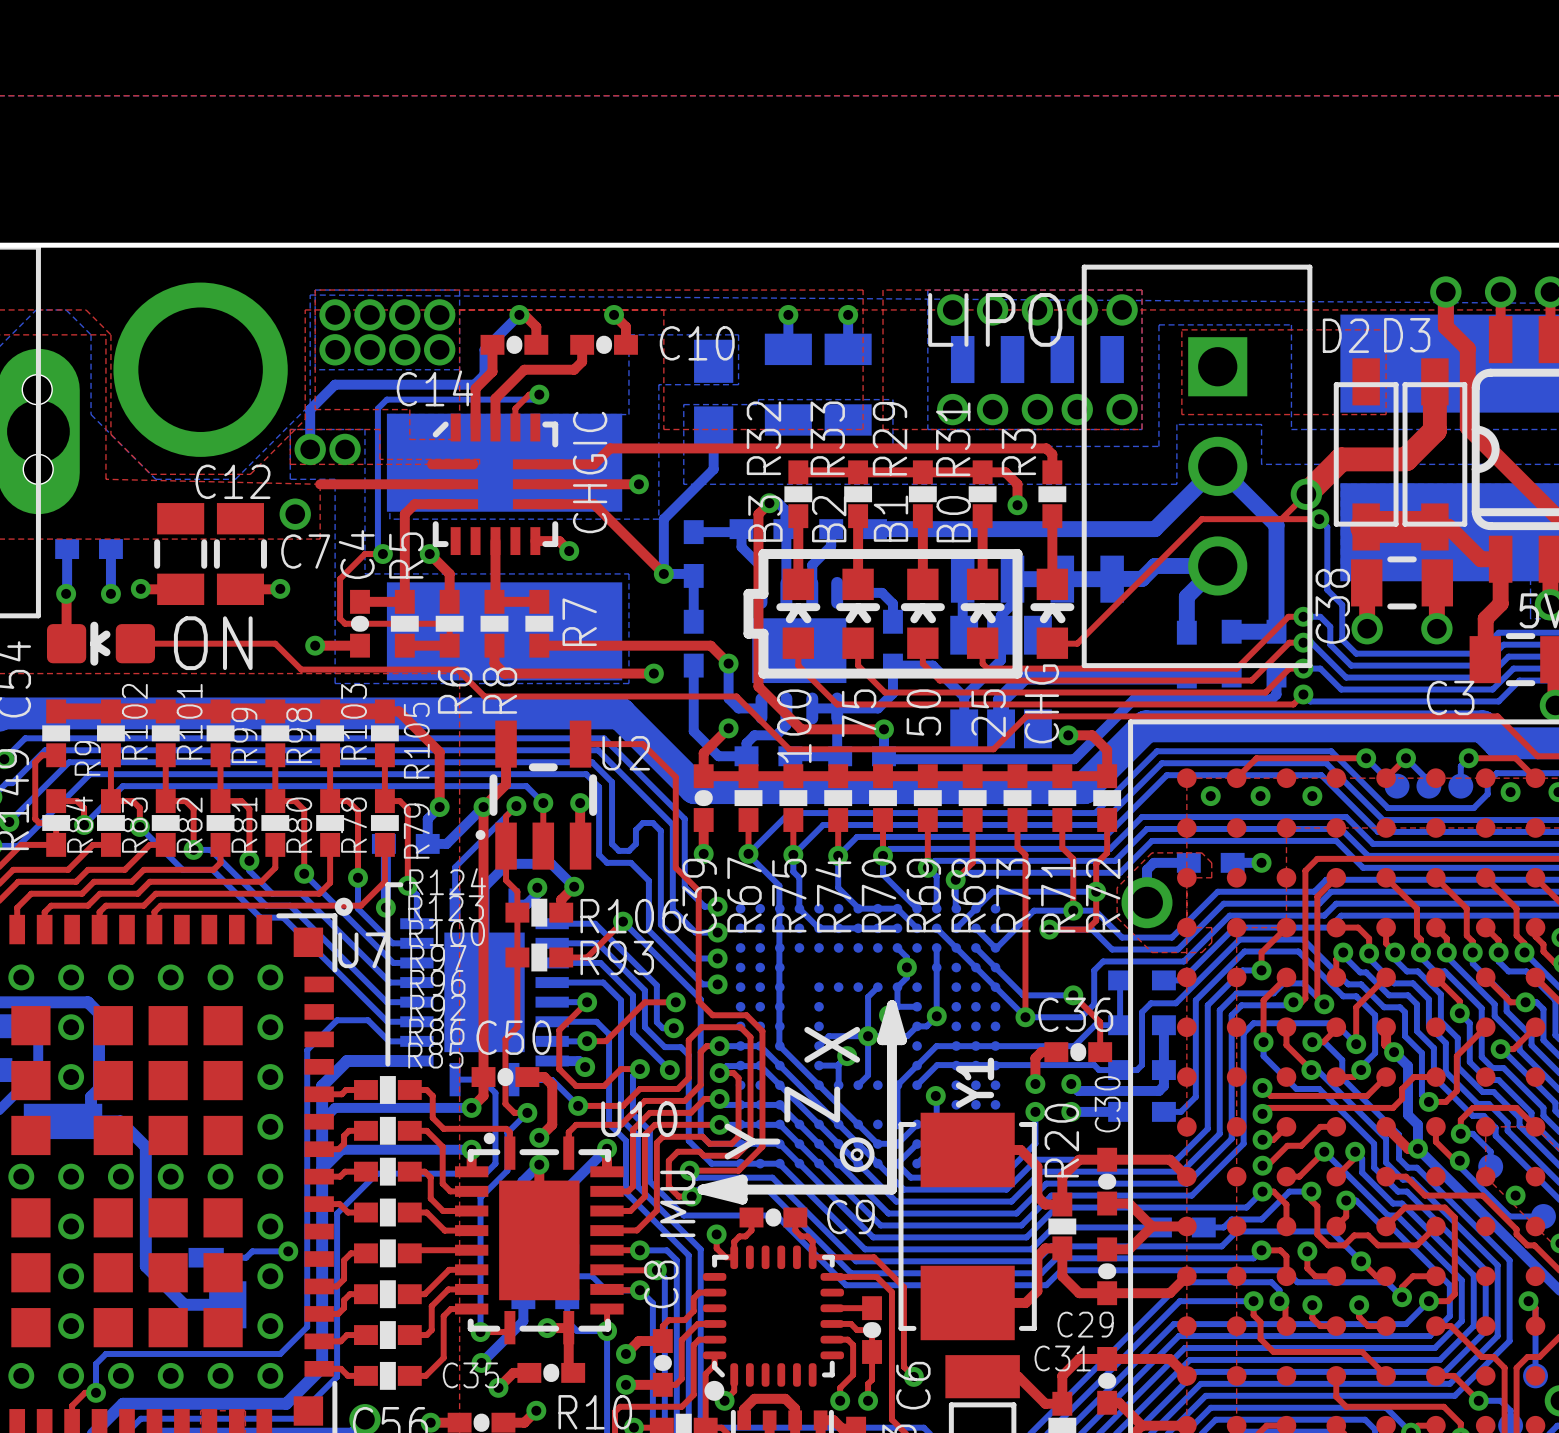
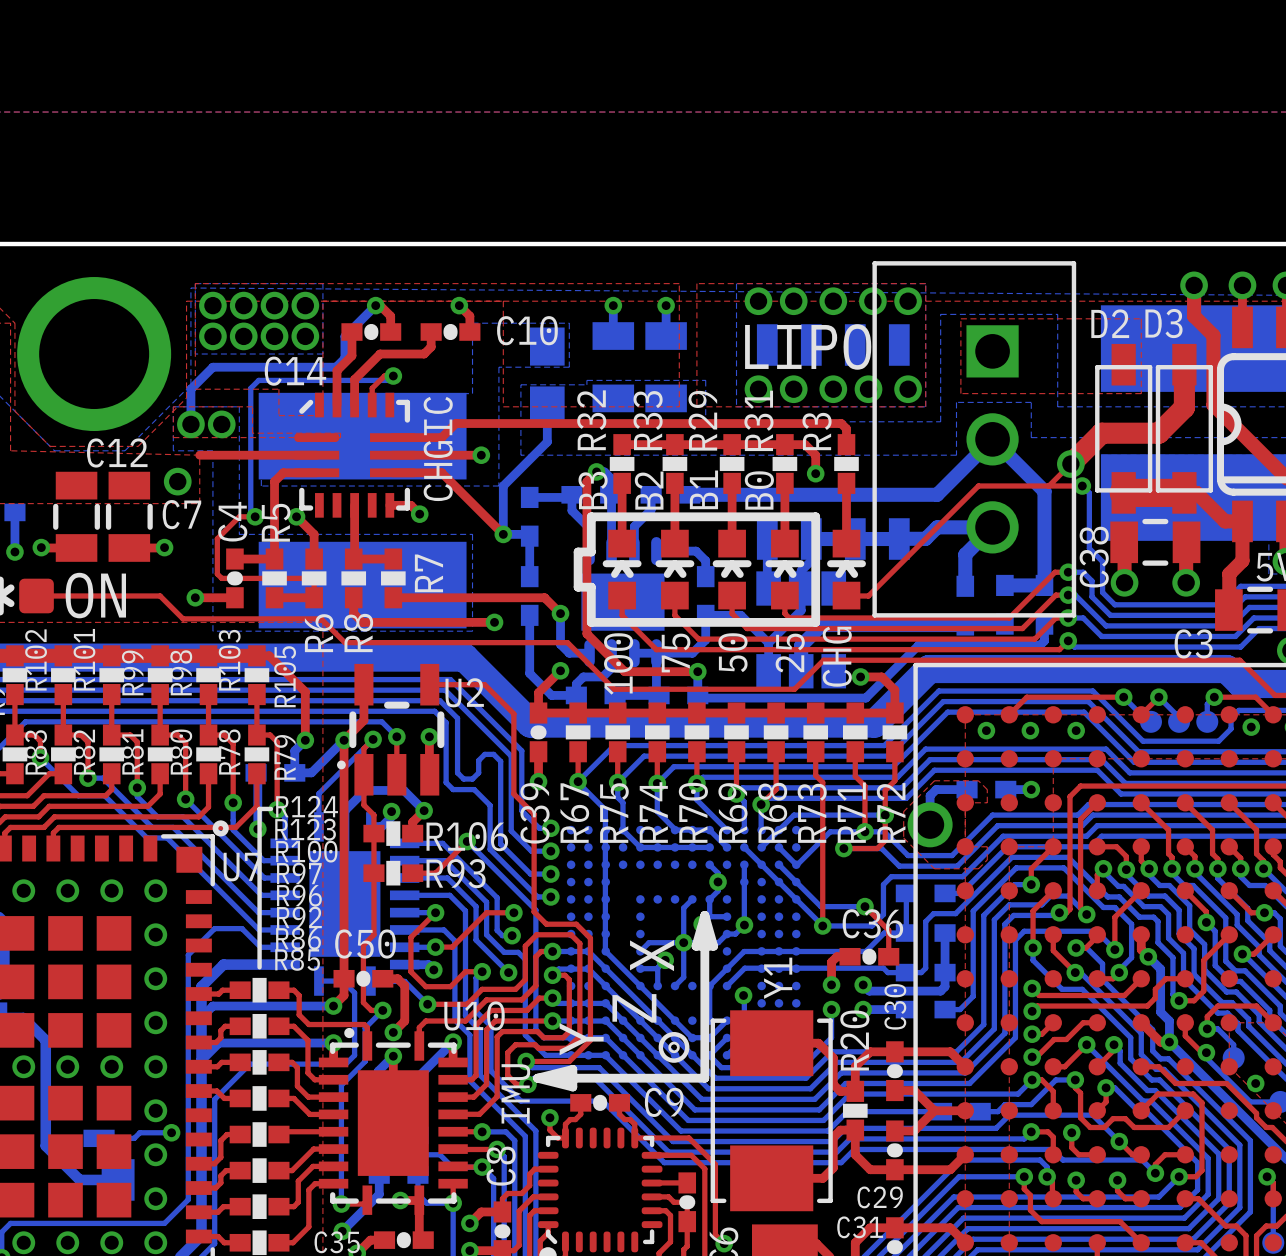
LIPO name position: LIPO (995, 319) -> LIPO (808, 346)

